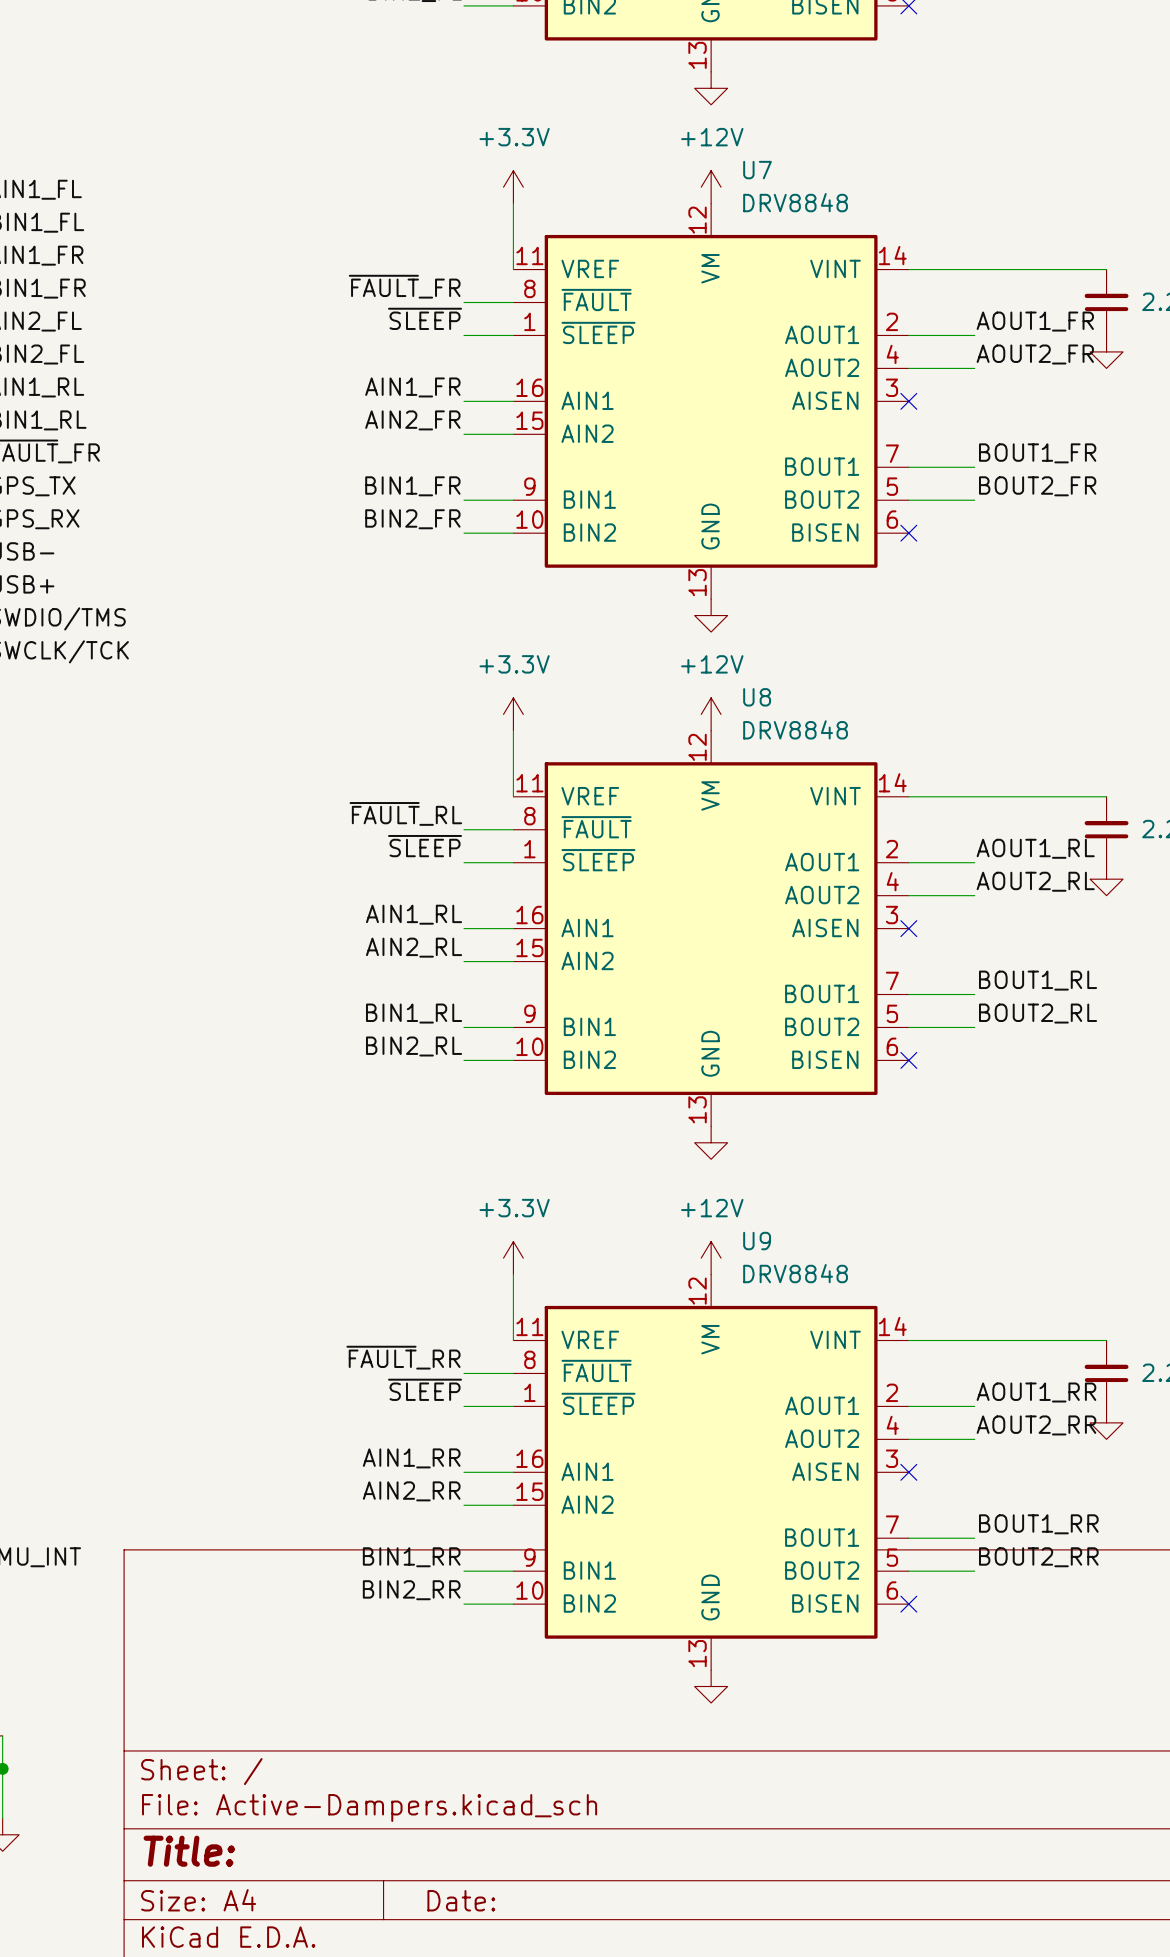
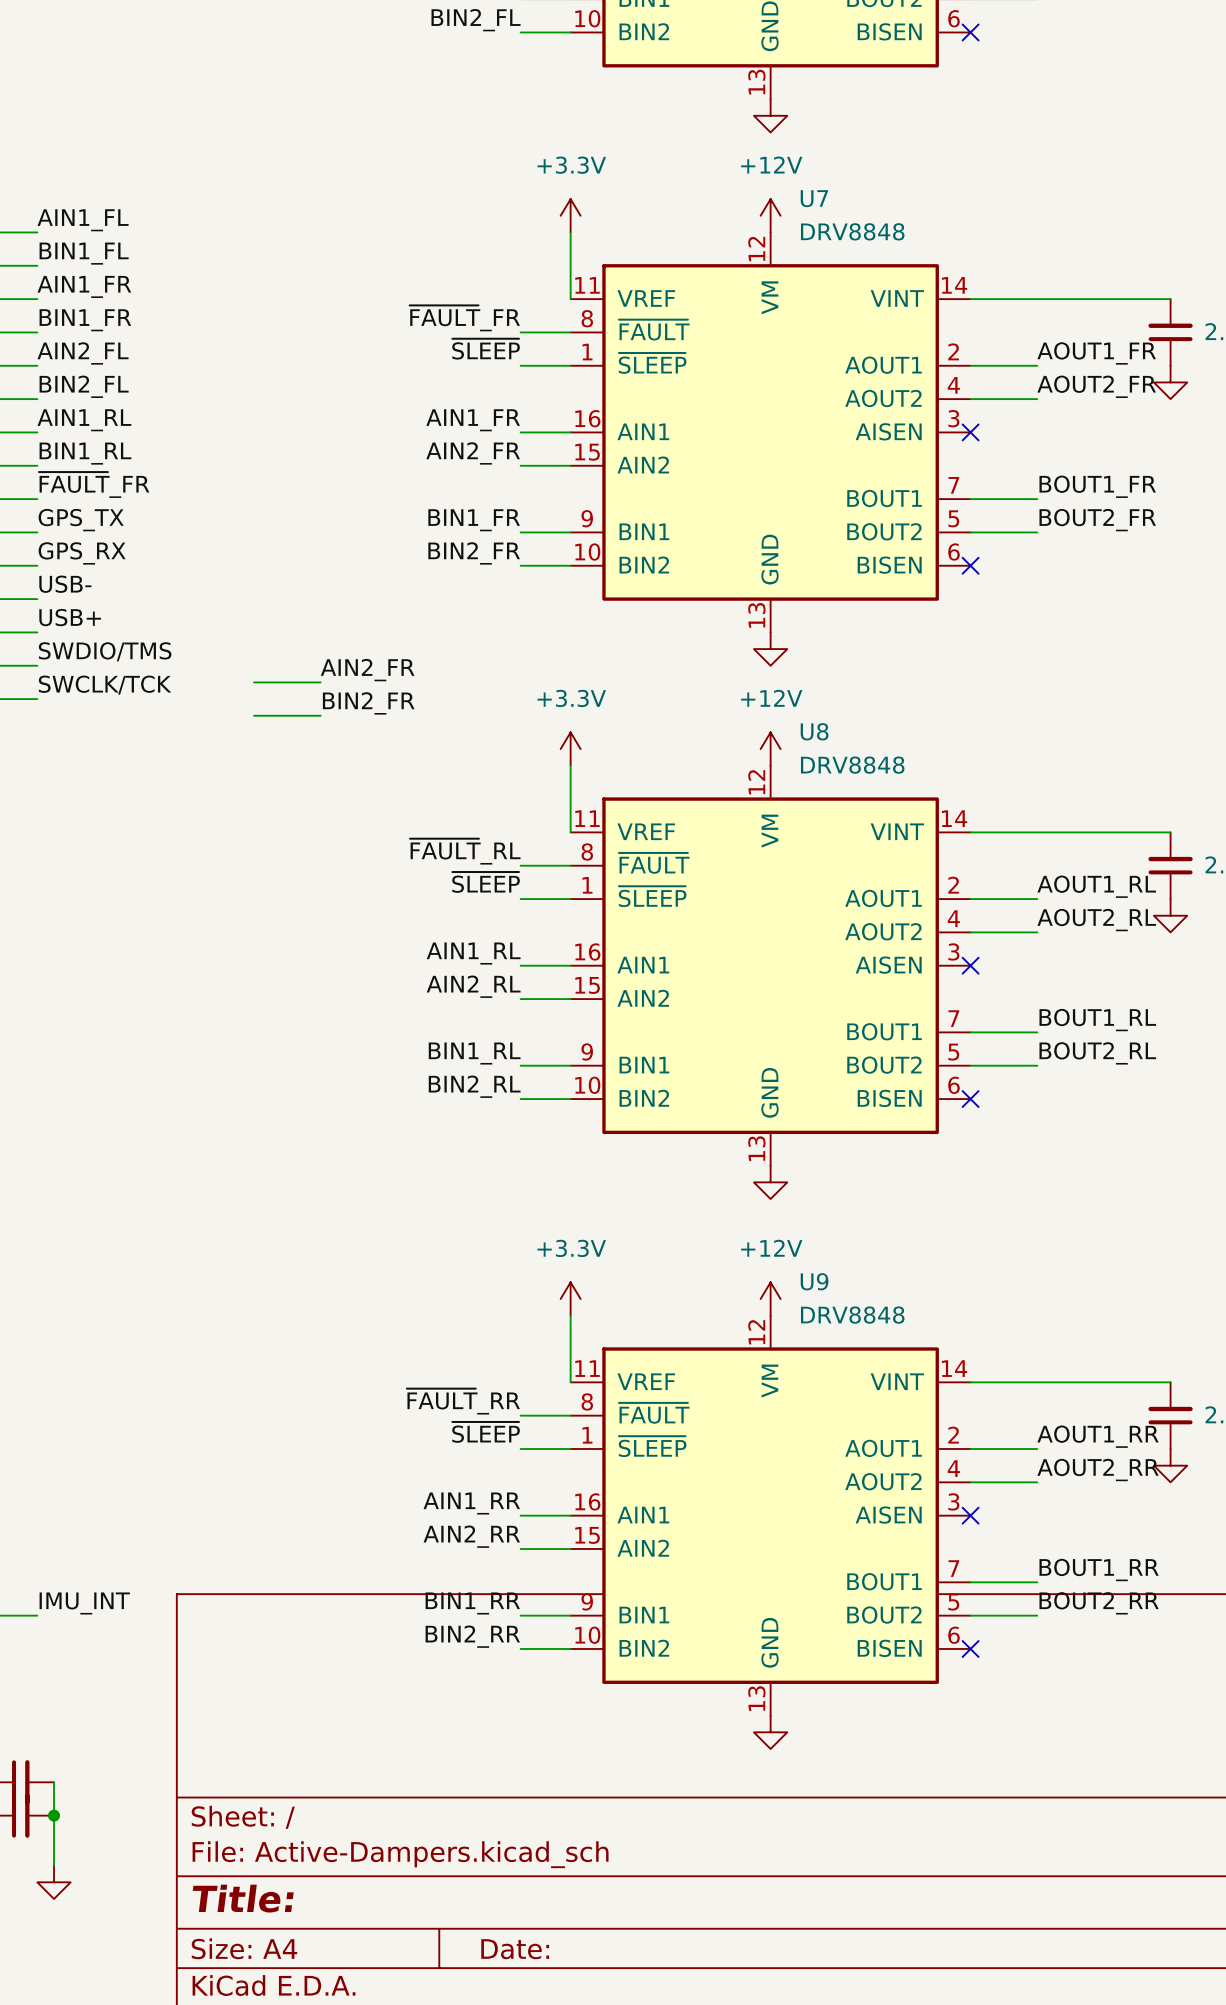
label: none -> AIN2_FR (367, 670)
wire: none -> (253, 682) (320, 682)
label: none -> BIN2_FR (368, 703)
wire: none -> (253, 715) (320, 715)

